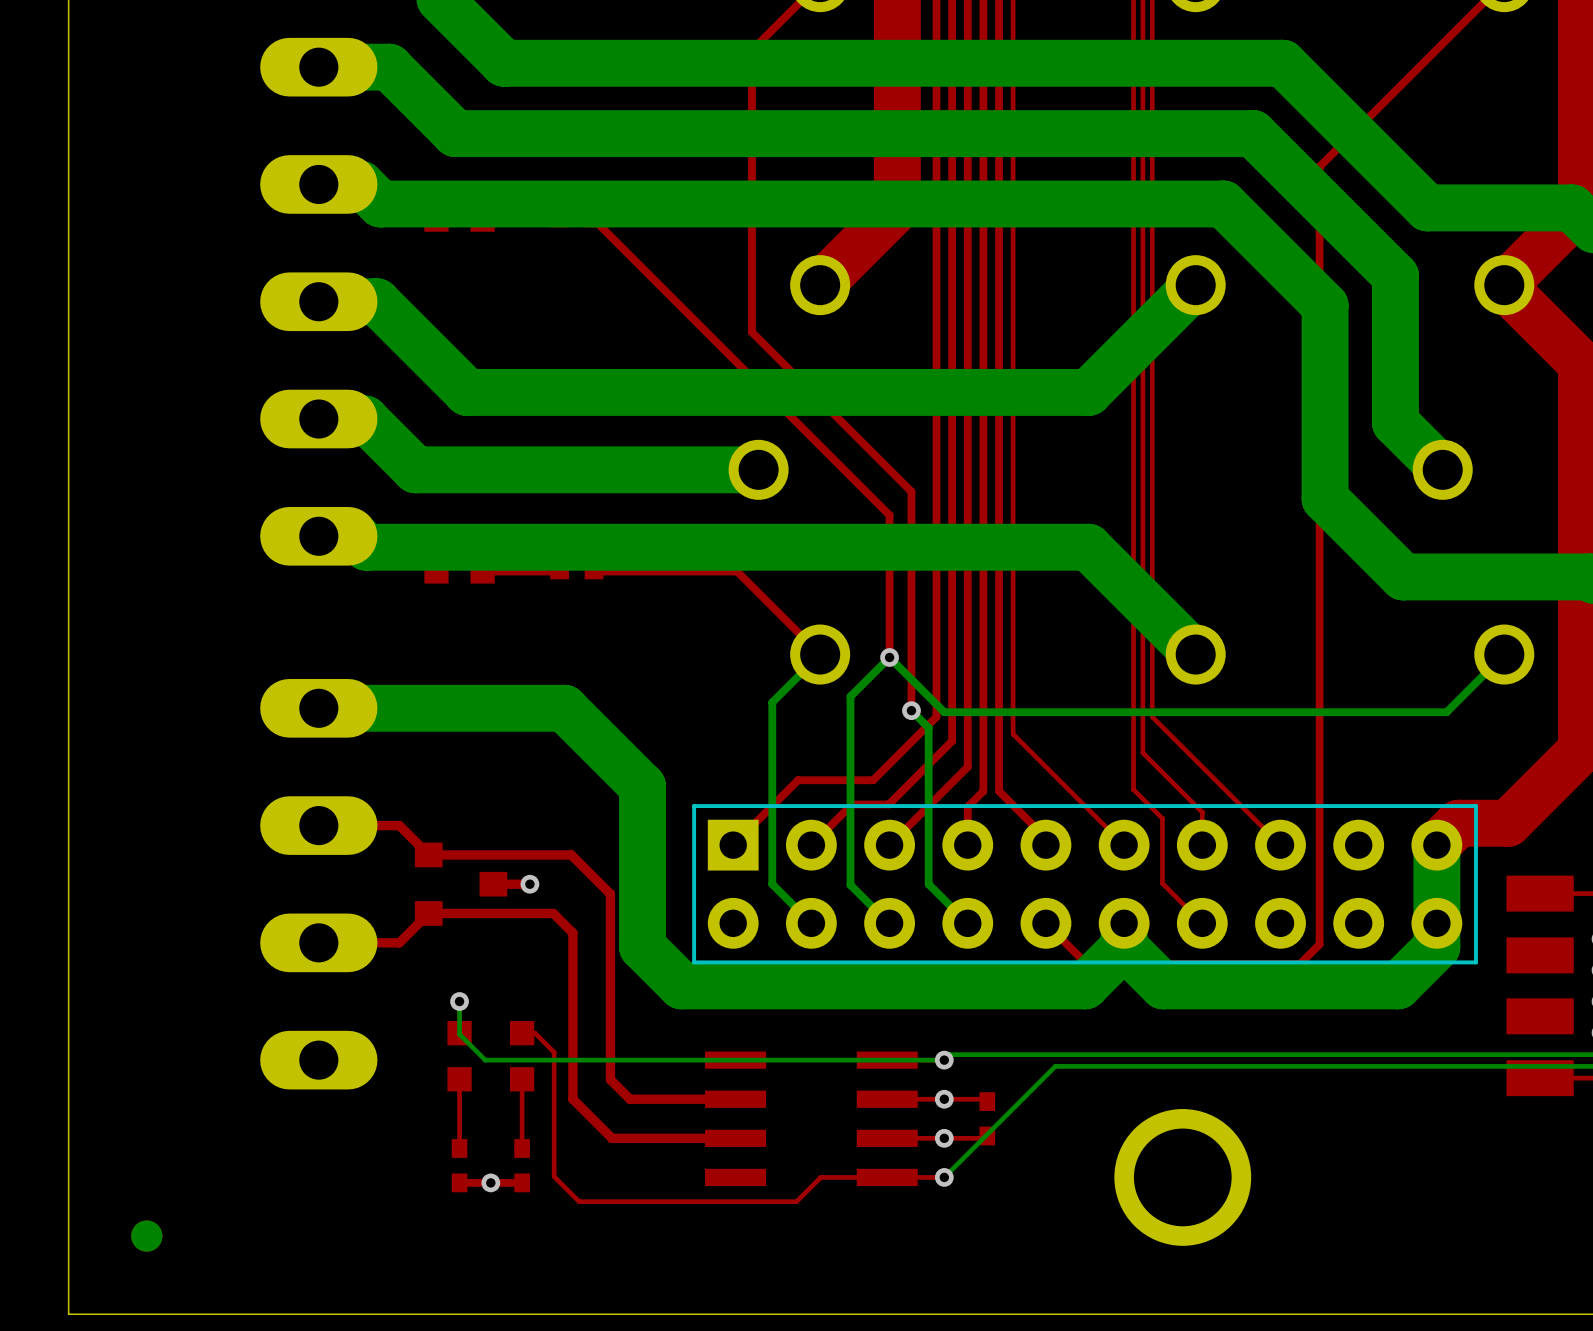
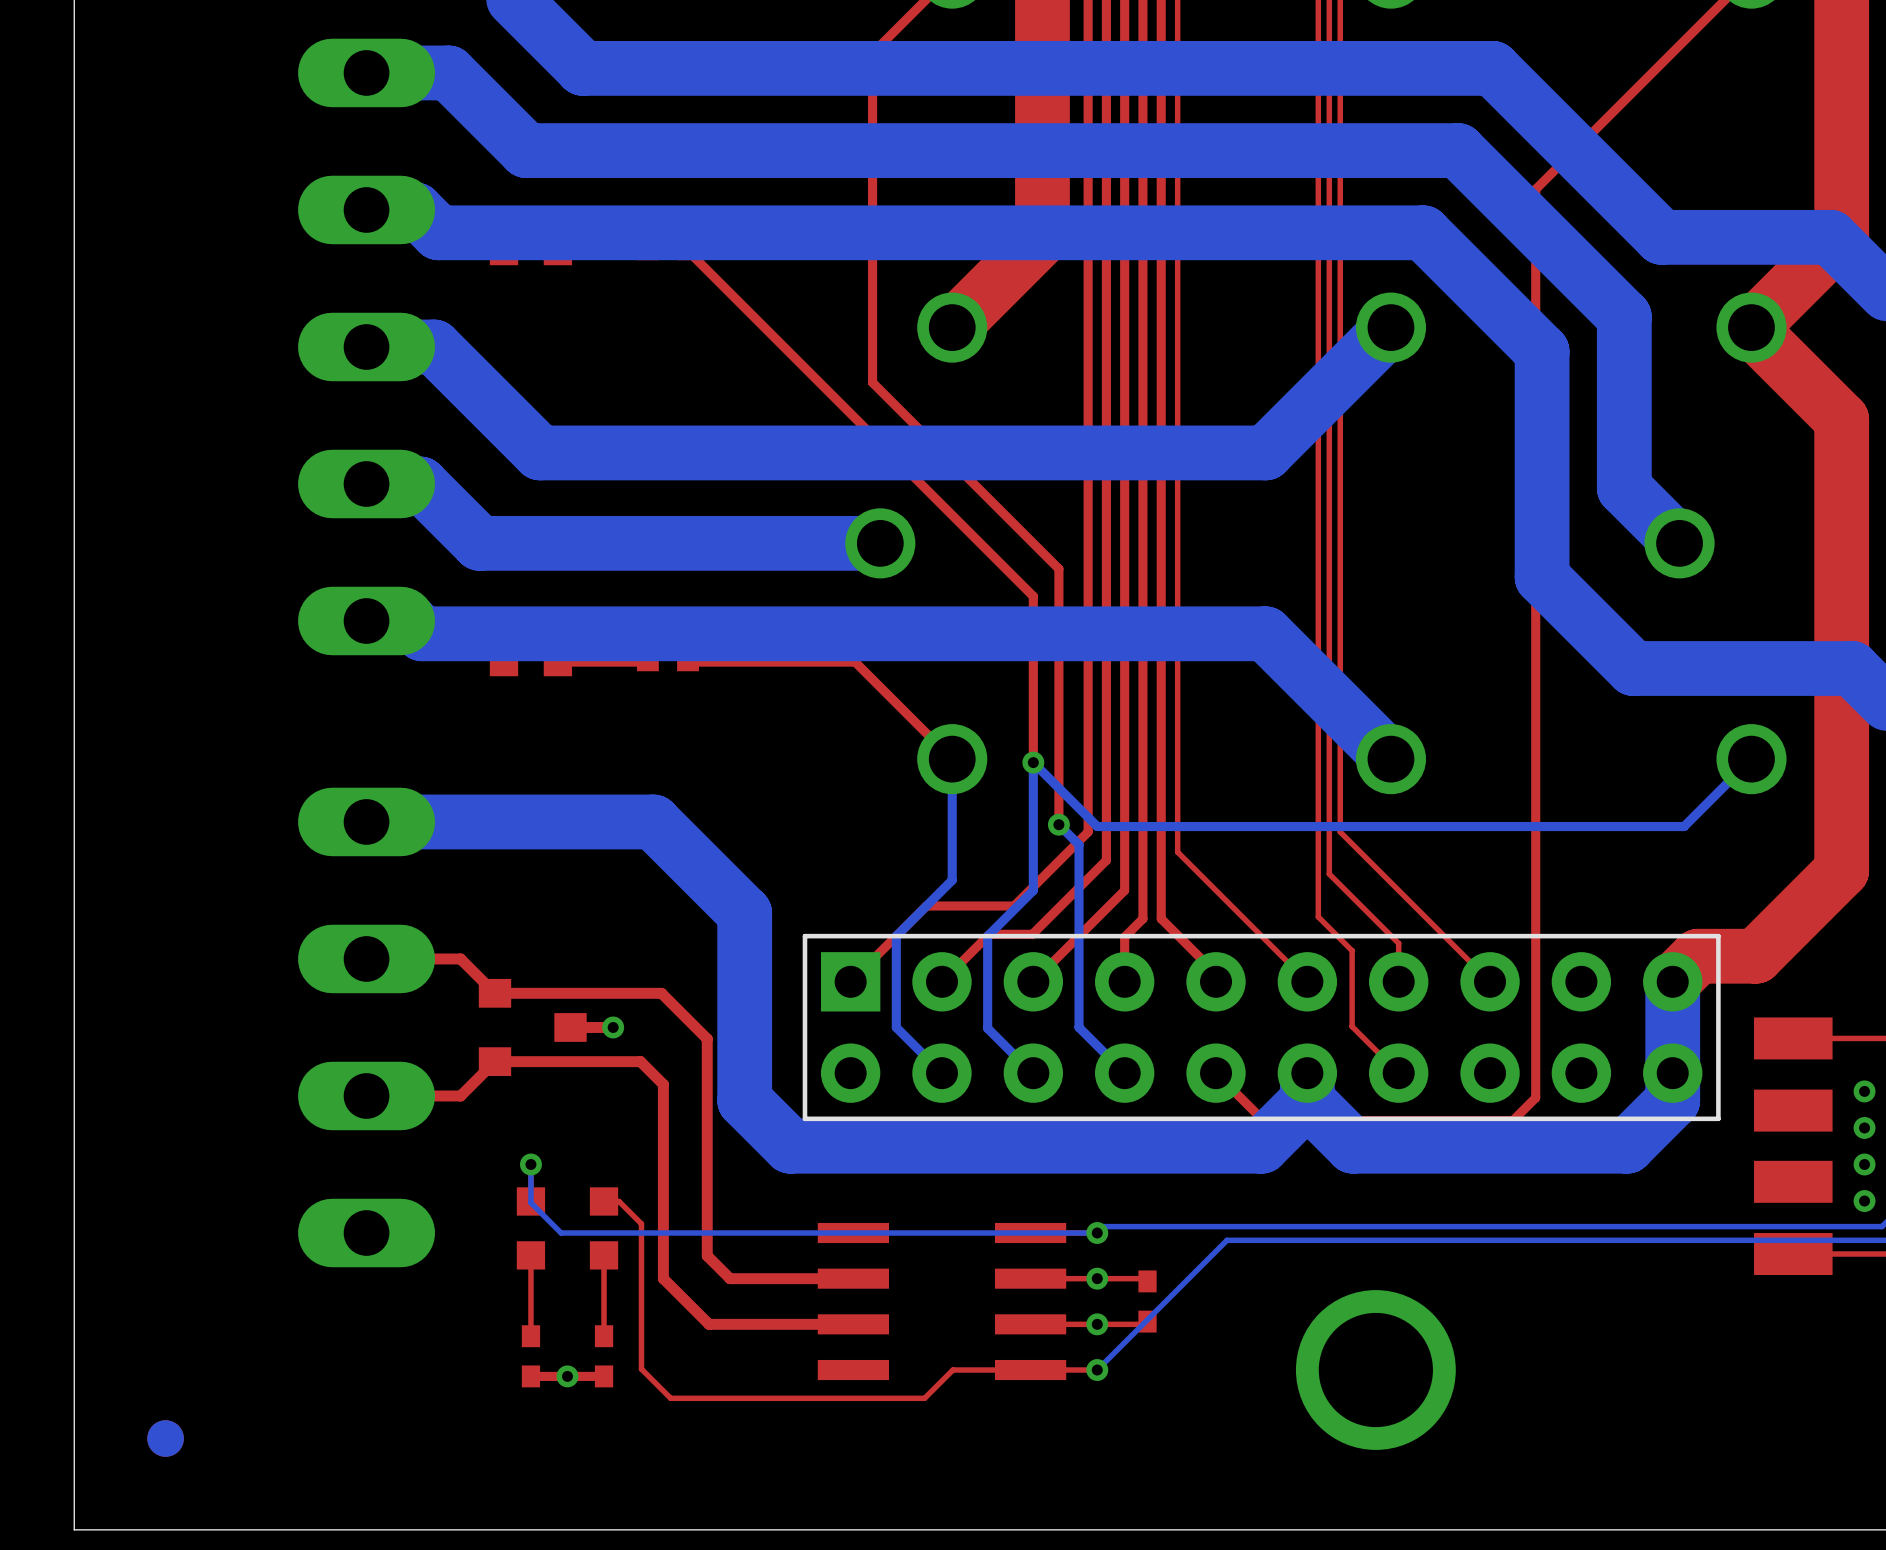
bottom track: (820, 654) (772, 702) (772, 806) -> (952, 759) (952, 880) (896, 936)
bottom track: (889, 657) (850, 696) (850, 806) -> (1033, 762) (1033, 890) (987, 936)

